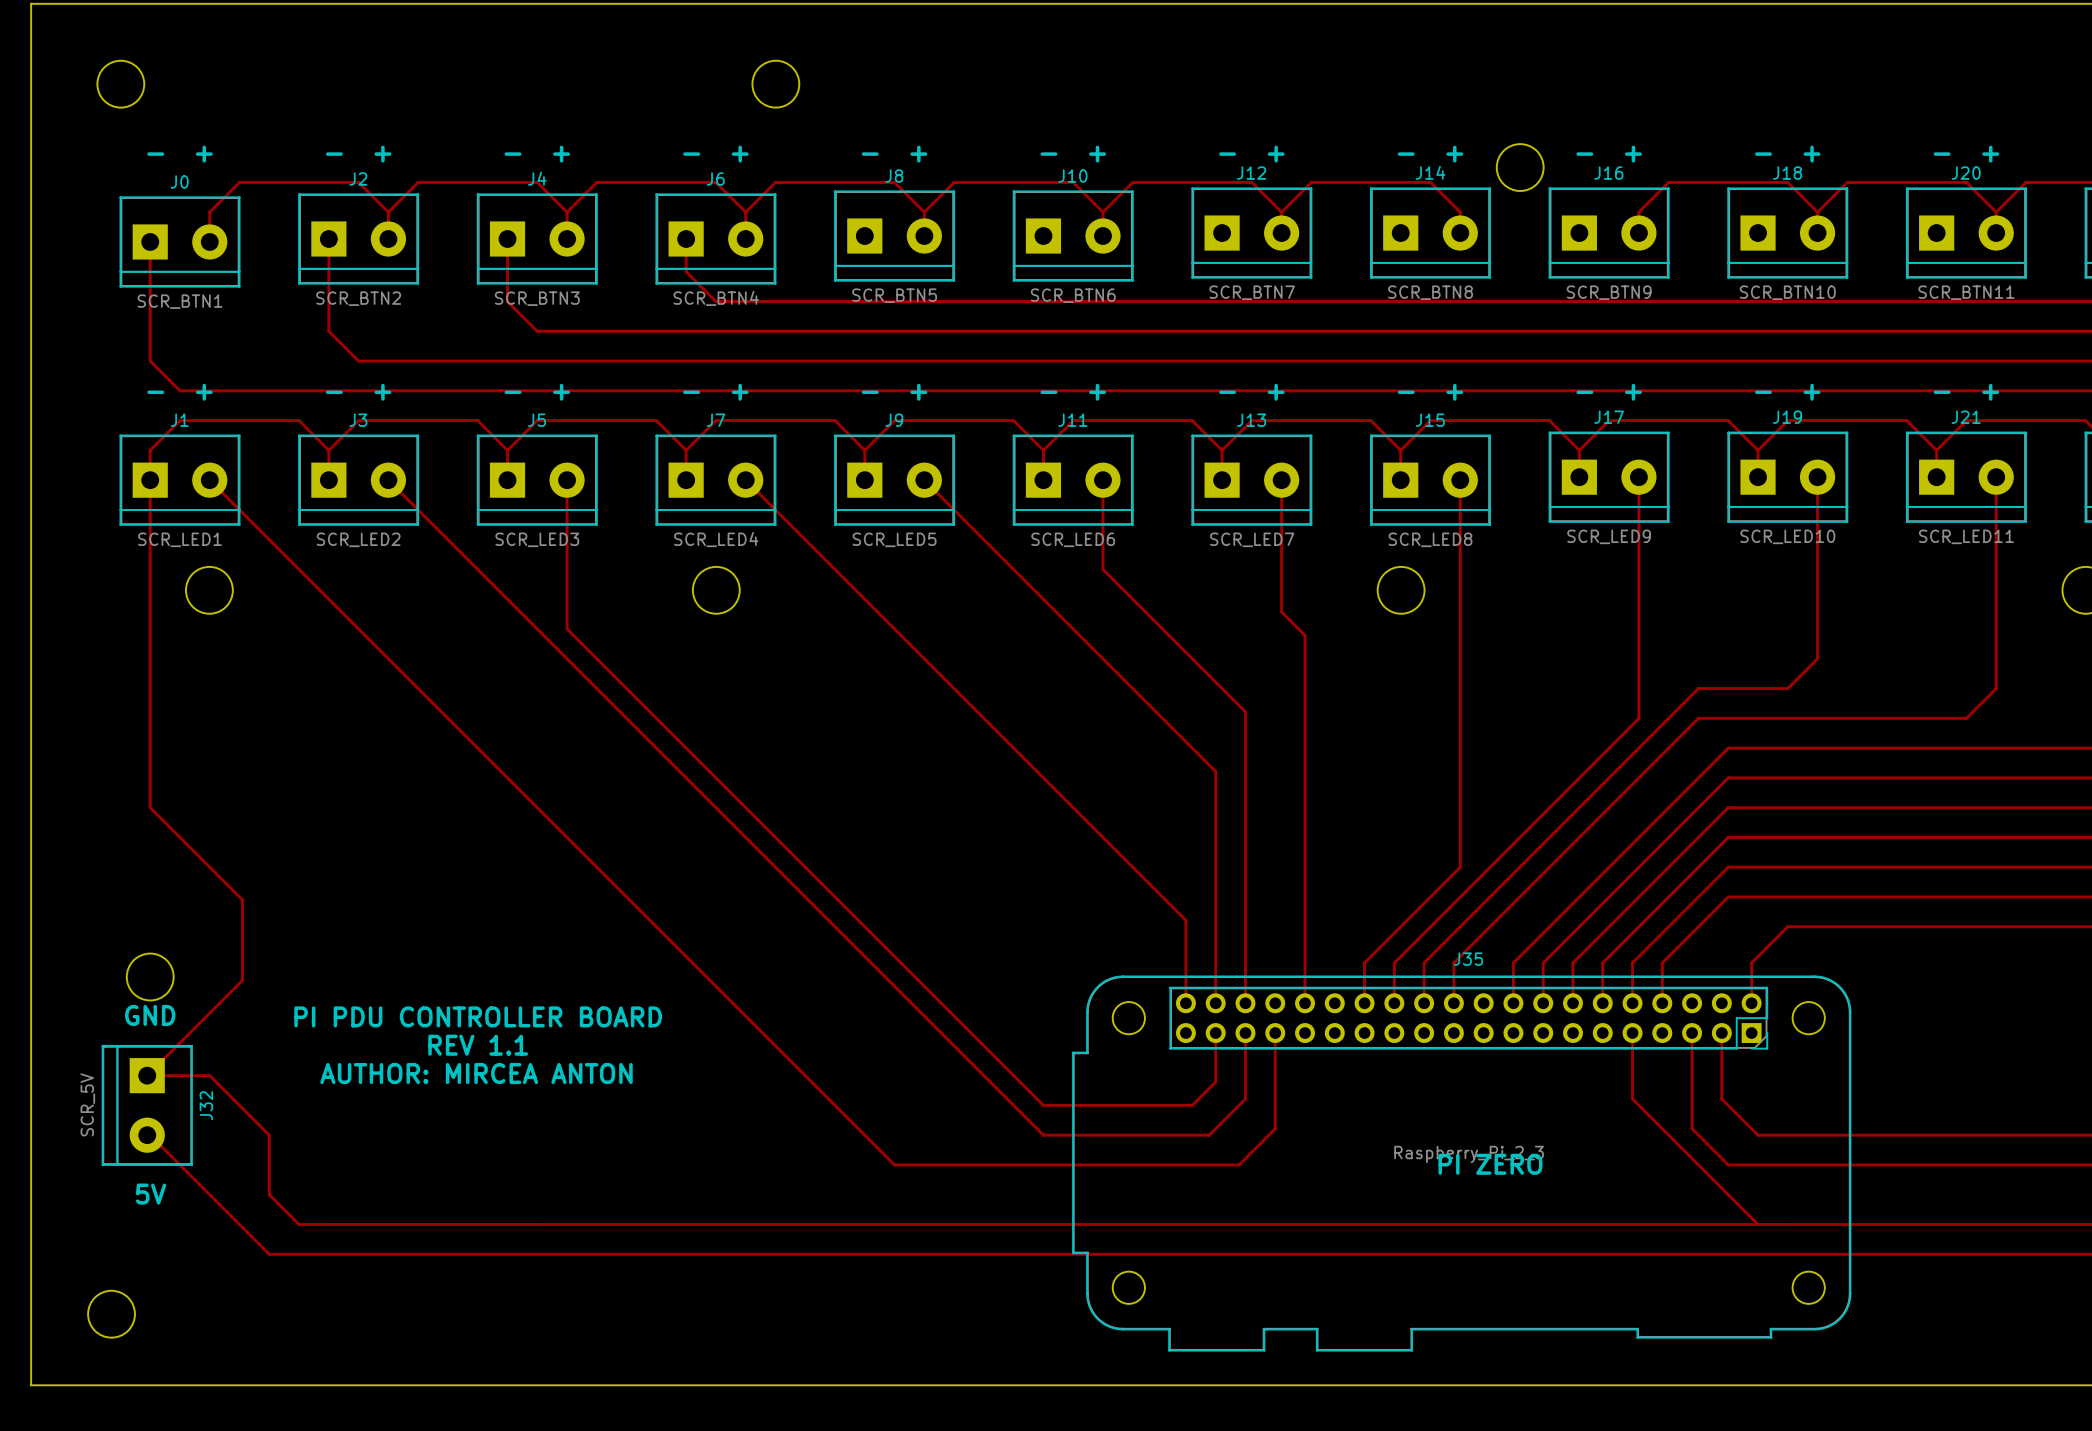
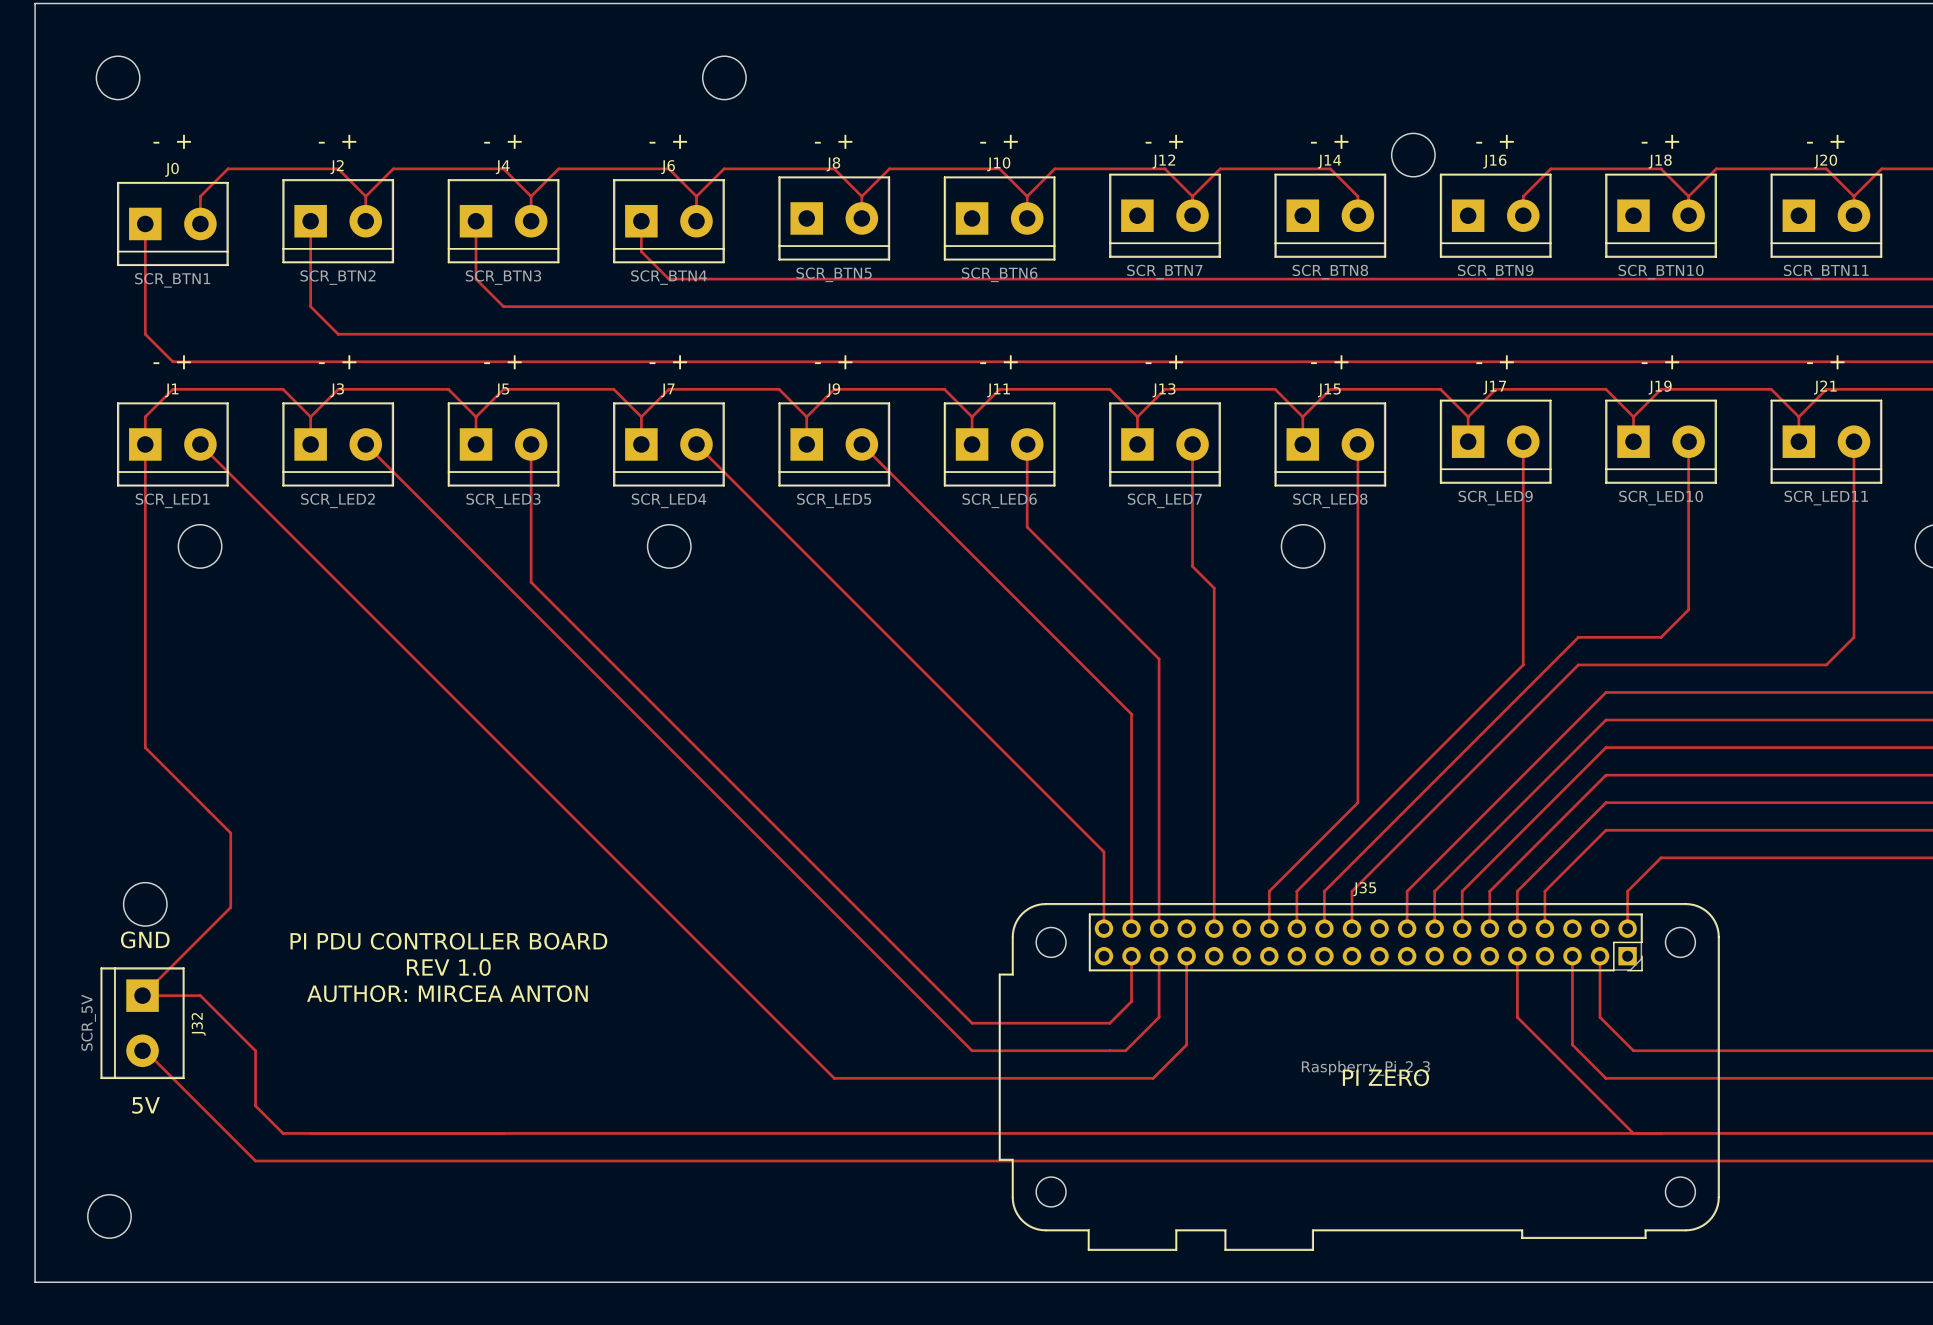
text: REV 1.1 (478, 1045) -> REV 1.0 (448, 967)

